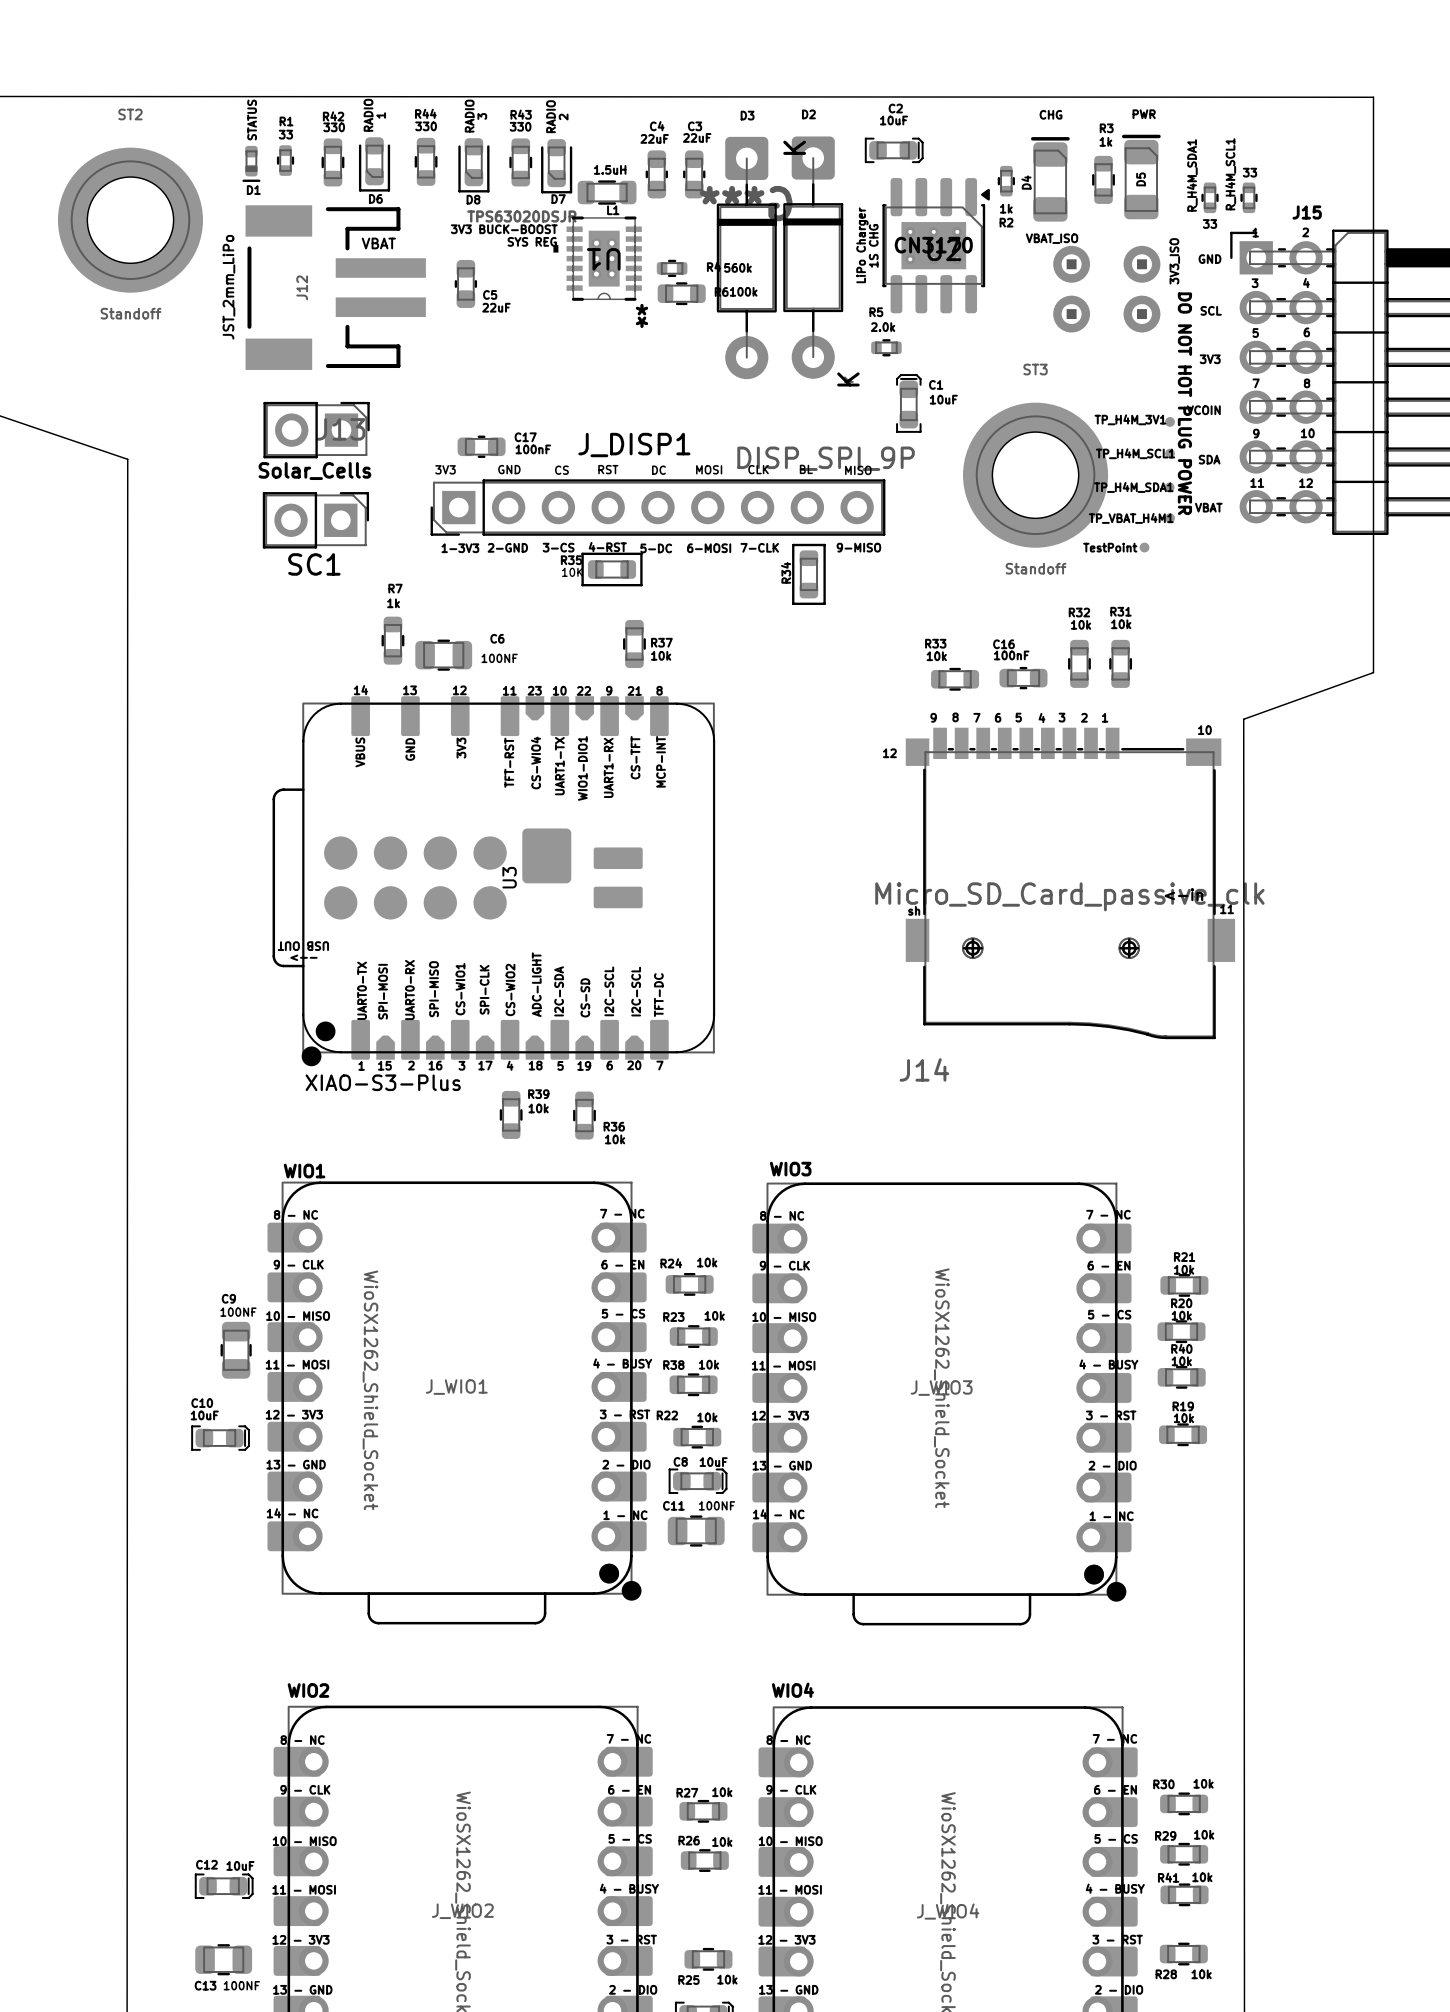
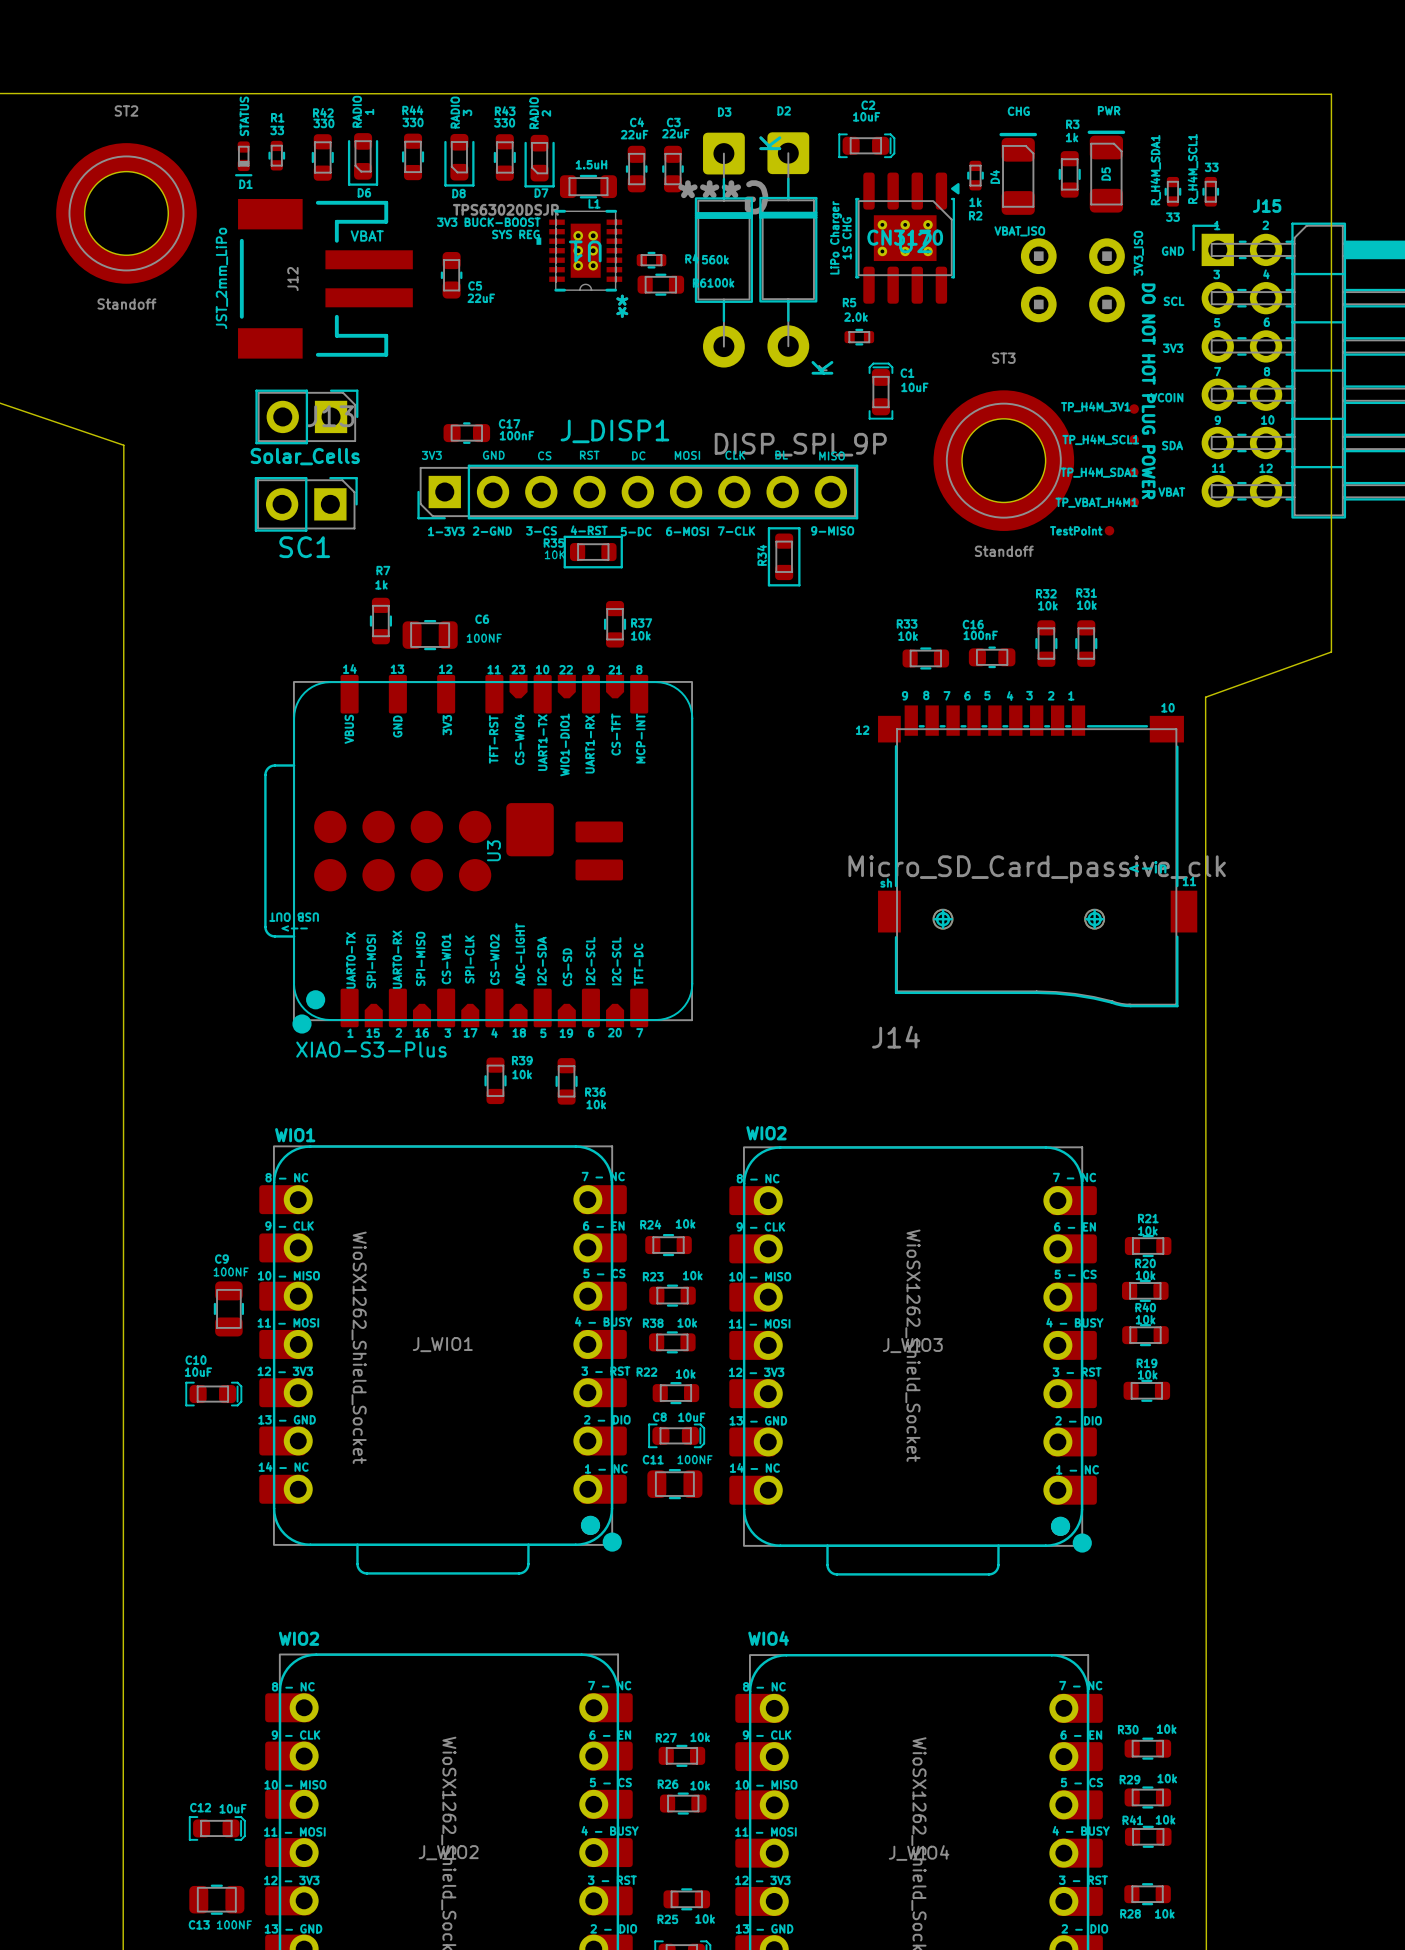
text: WIO3 (790, 1169) -> WIO2 (766, 1133)

